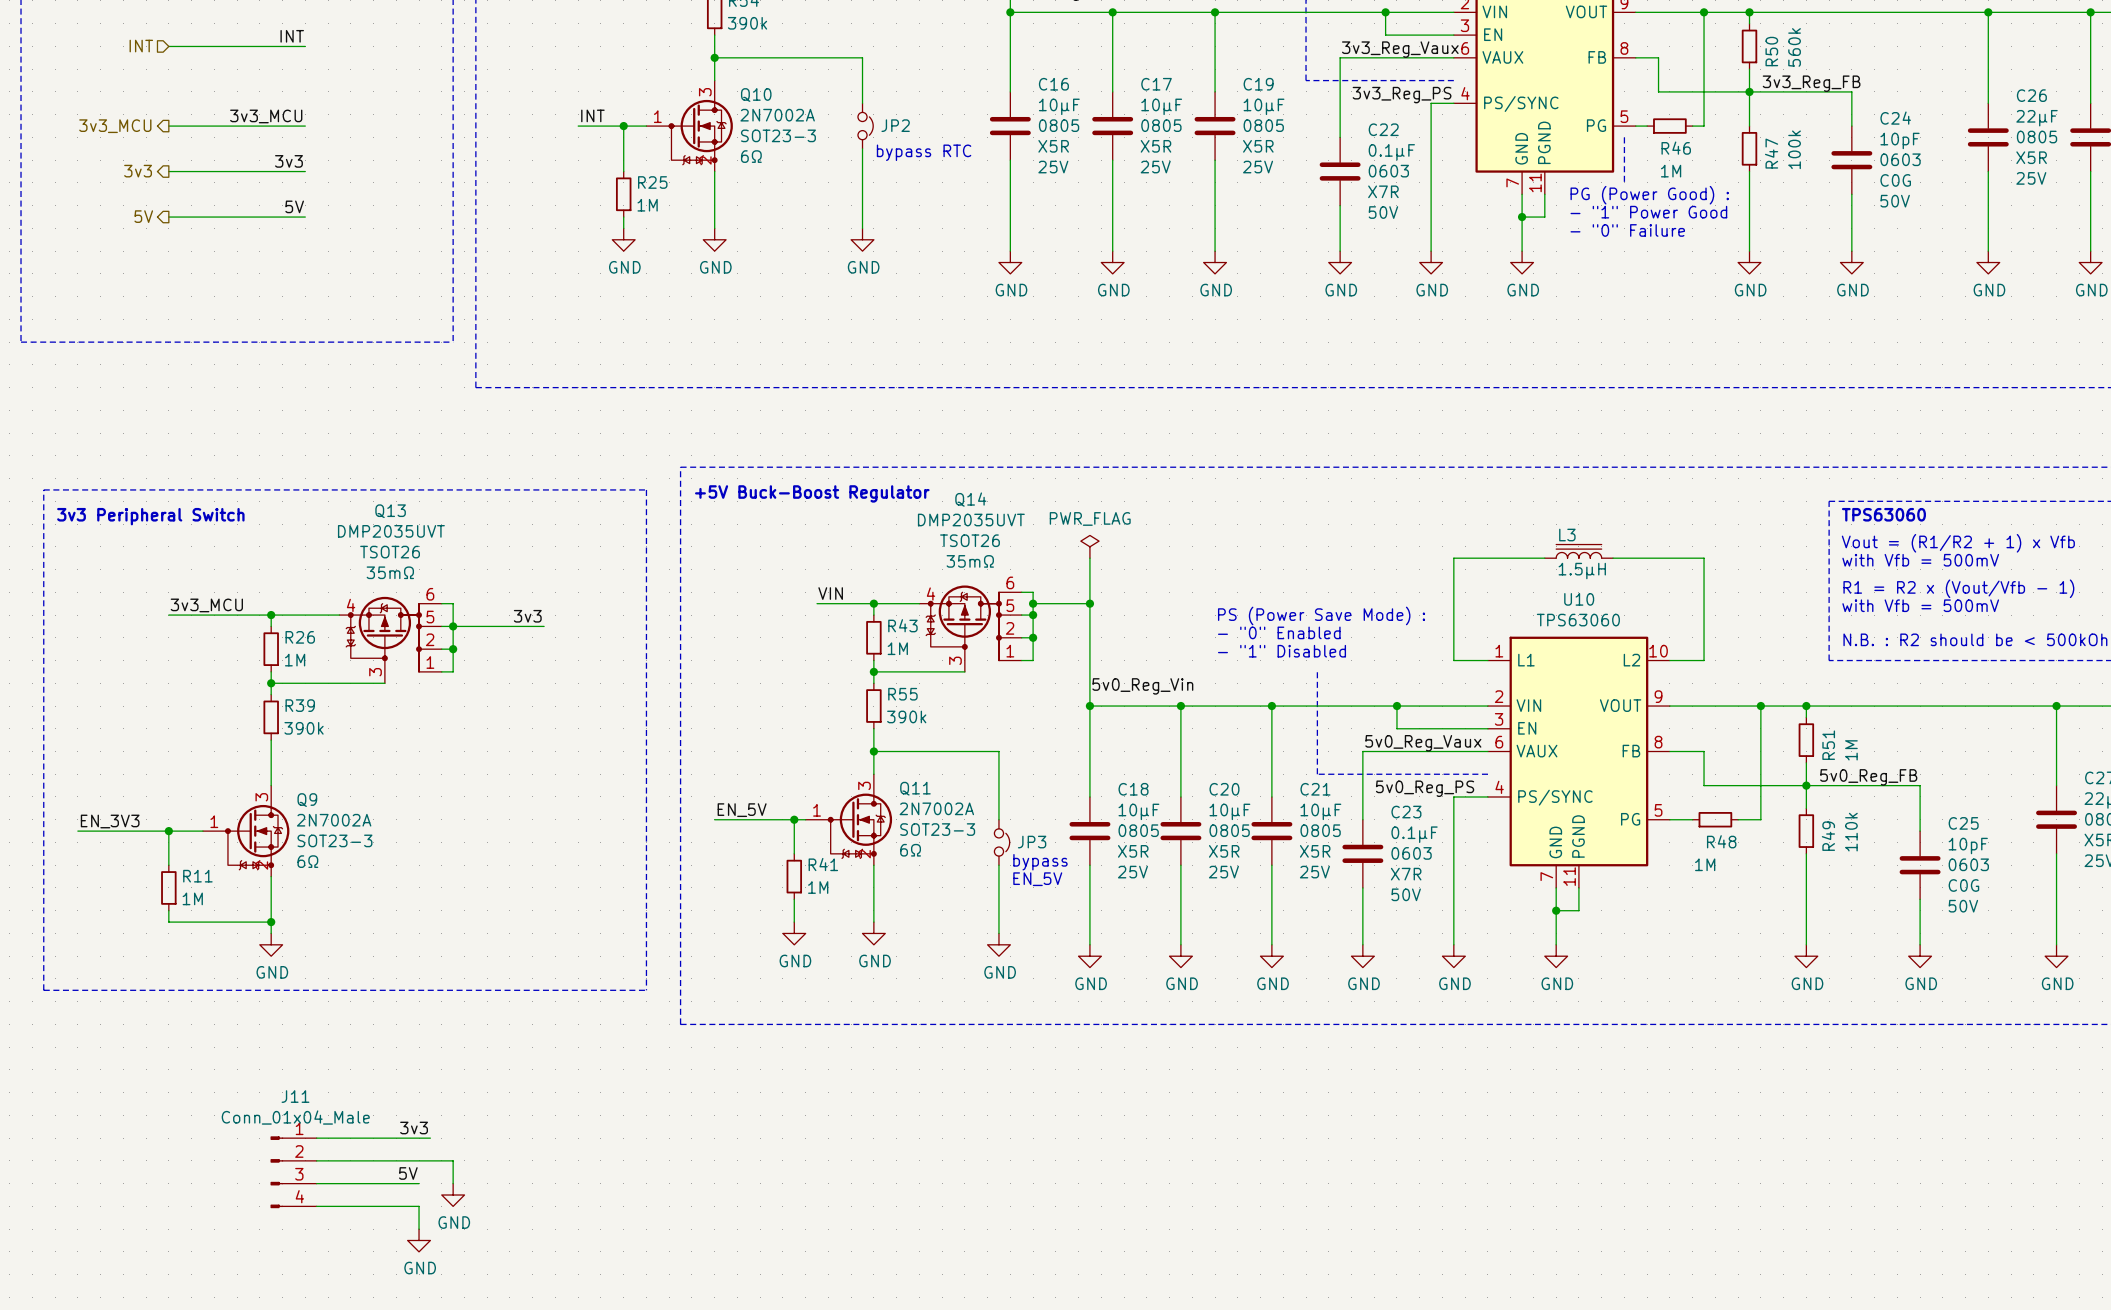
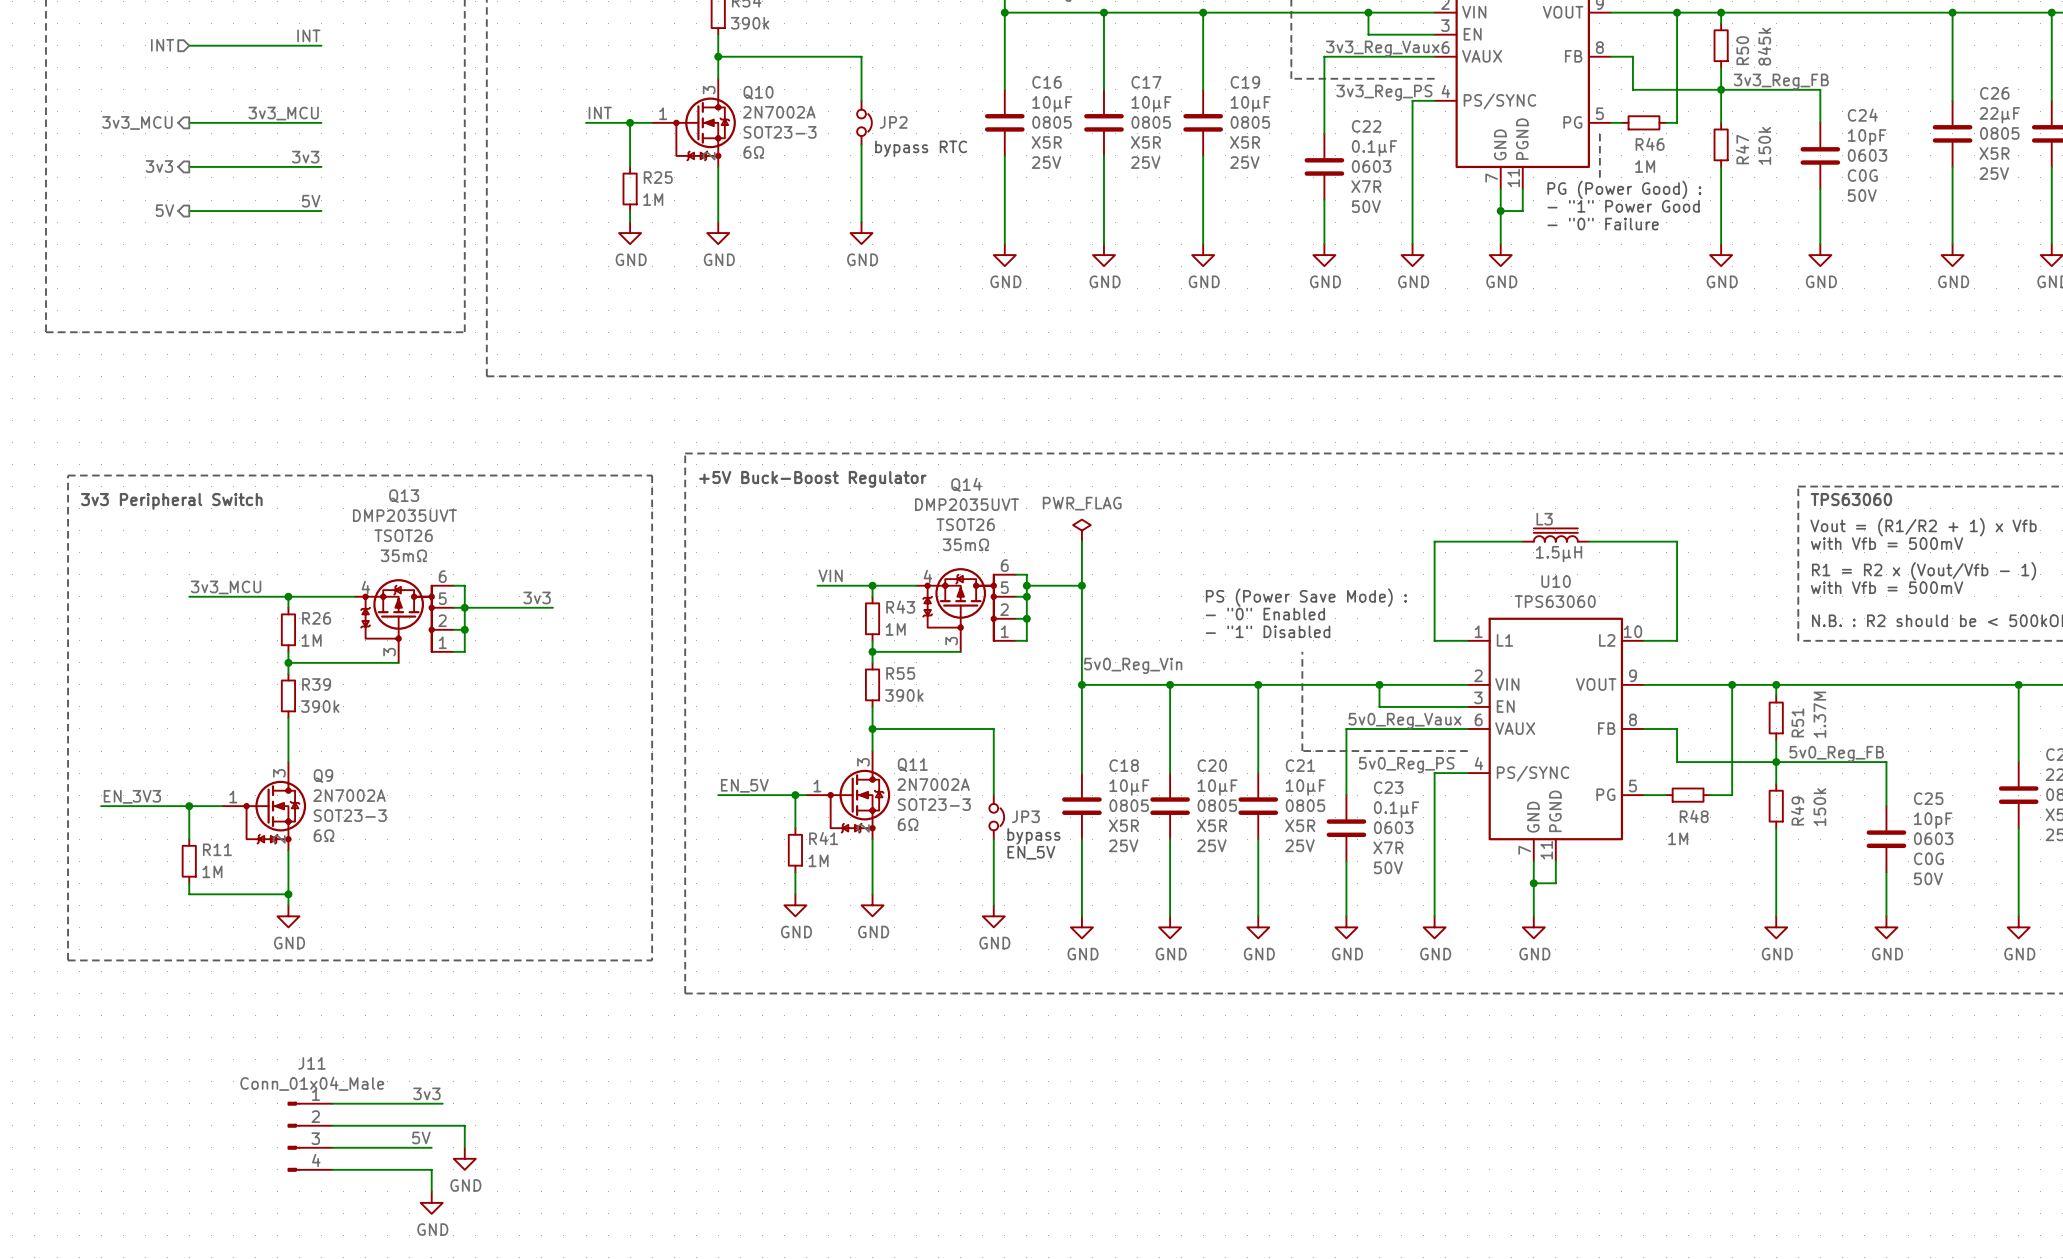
R50 value: 560k (1794, 47) -> 845k (1764, 46)
R47 value: 100k (1794, 149) -> 150k (1764, 145)
R51 value: 1M (1851, 750) -> 1.37M (1819, 714)
R49 value: 110k (1851, 832) -> 150k (1819, 807)

